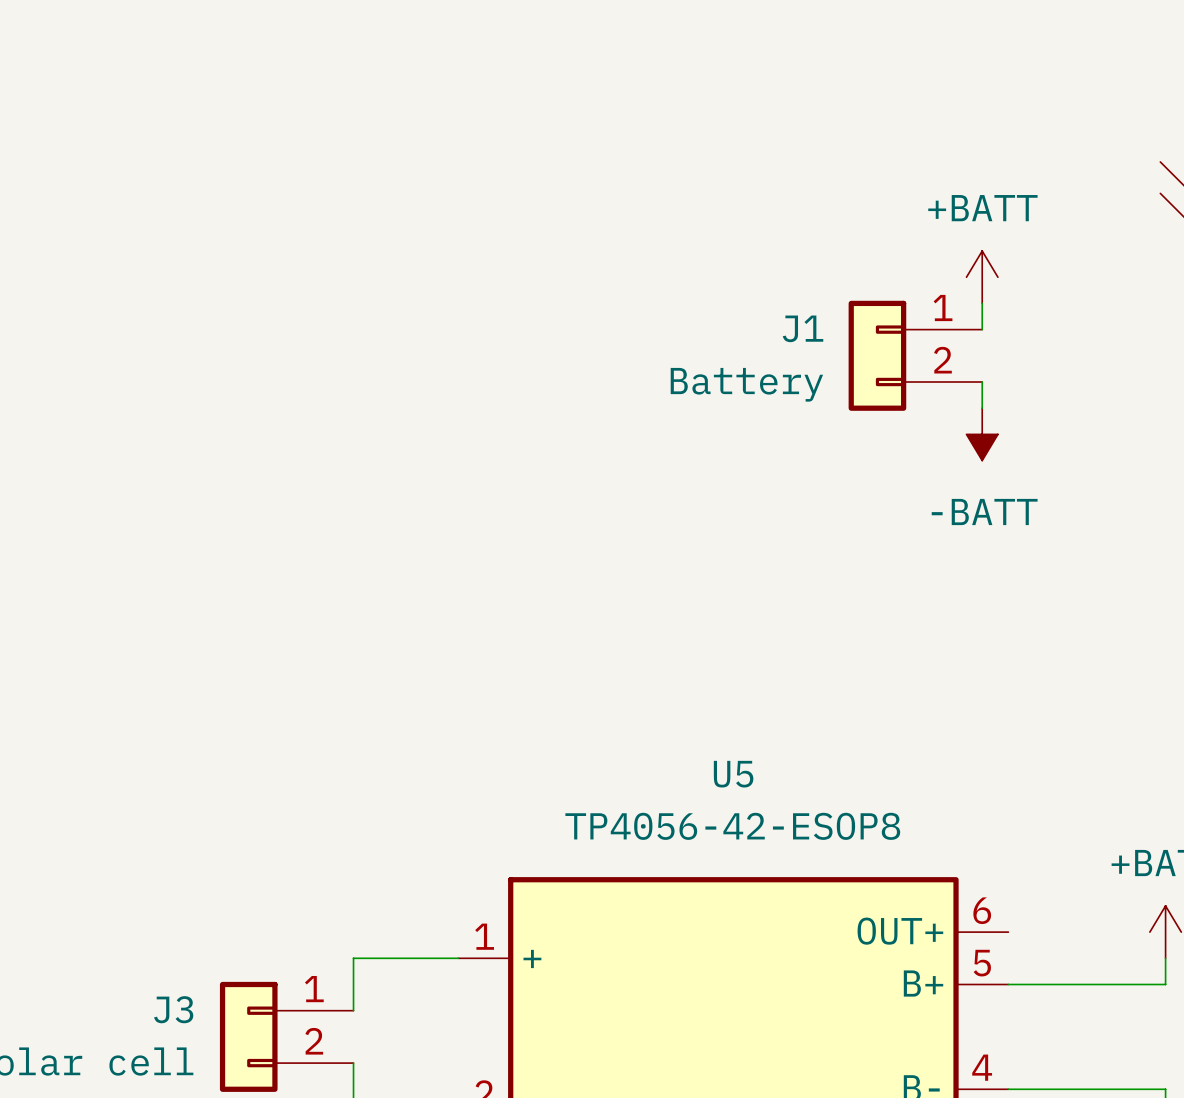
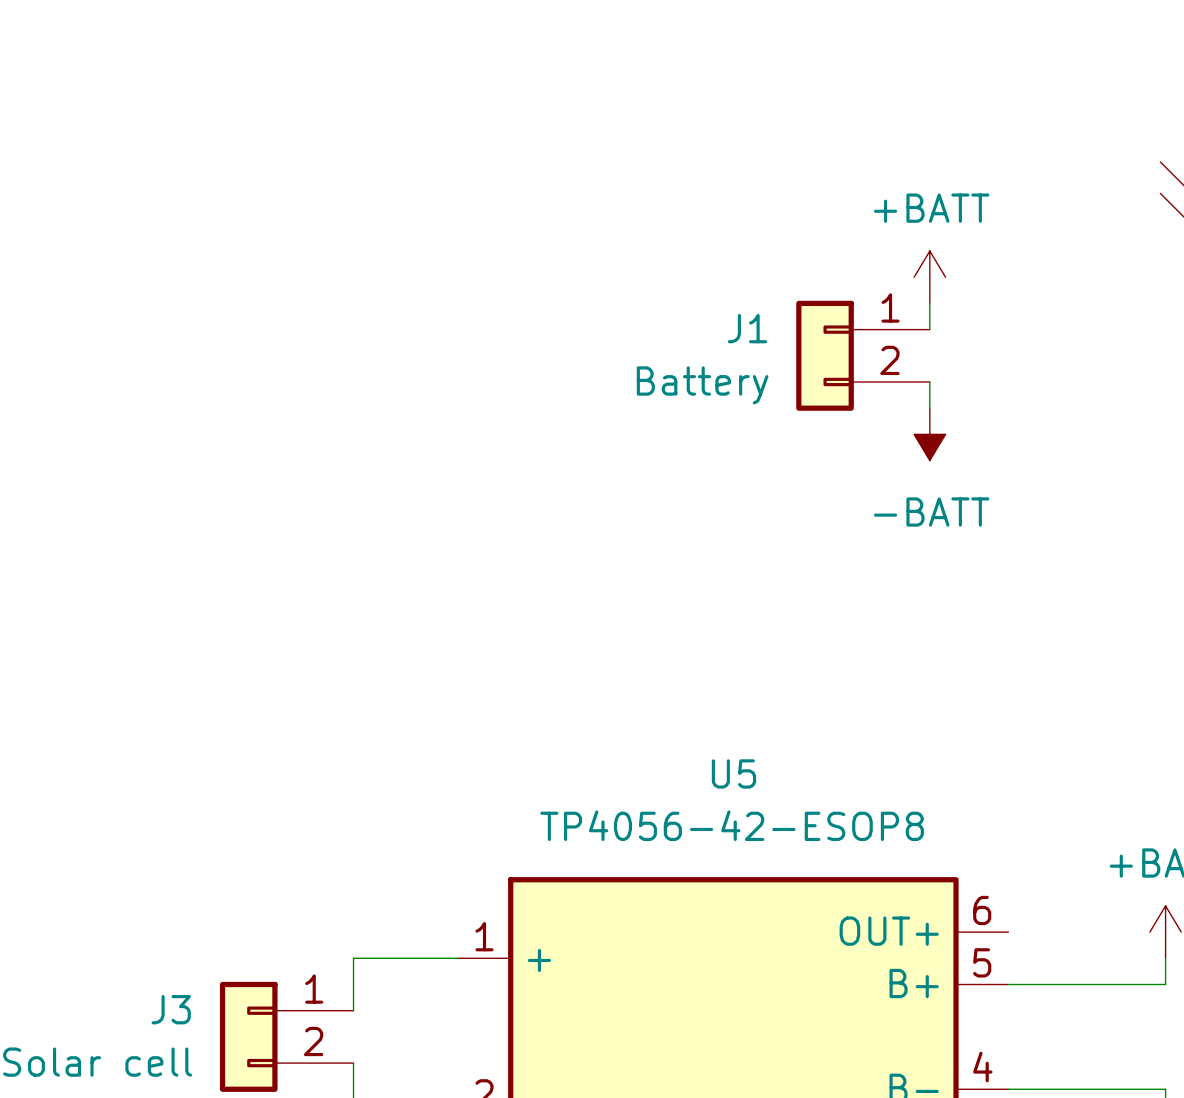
power symbol position: +BATT (982, 277) -> +BATT (929, 277)
wire: (982, 303) (982, 329) -> (929, 303) (929, 329)
J1 position: (915, 355) -> (863, 355)
wire: (982, 382) (982, 408) -> (929, 382) (929, 408)
power symbol position: -BATT (982, 434) -> -BATT (929, 434)

